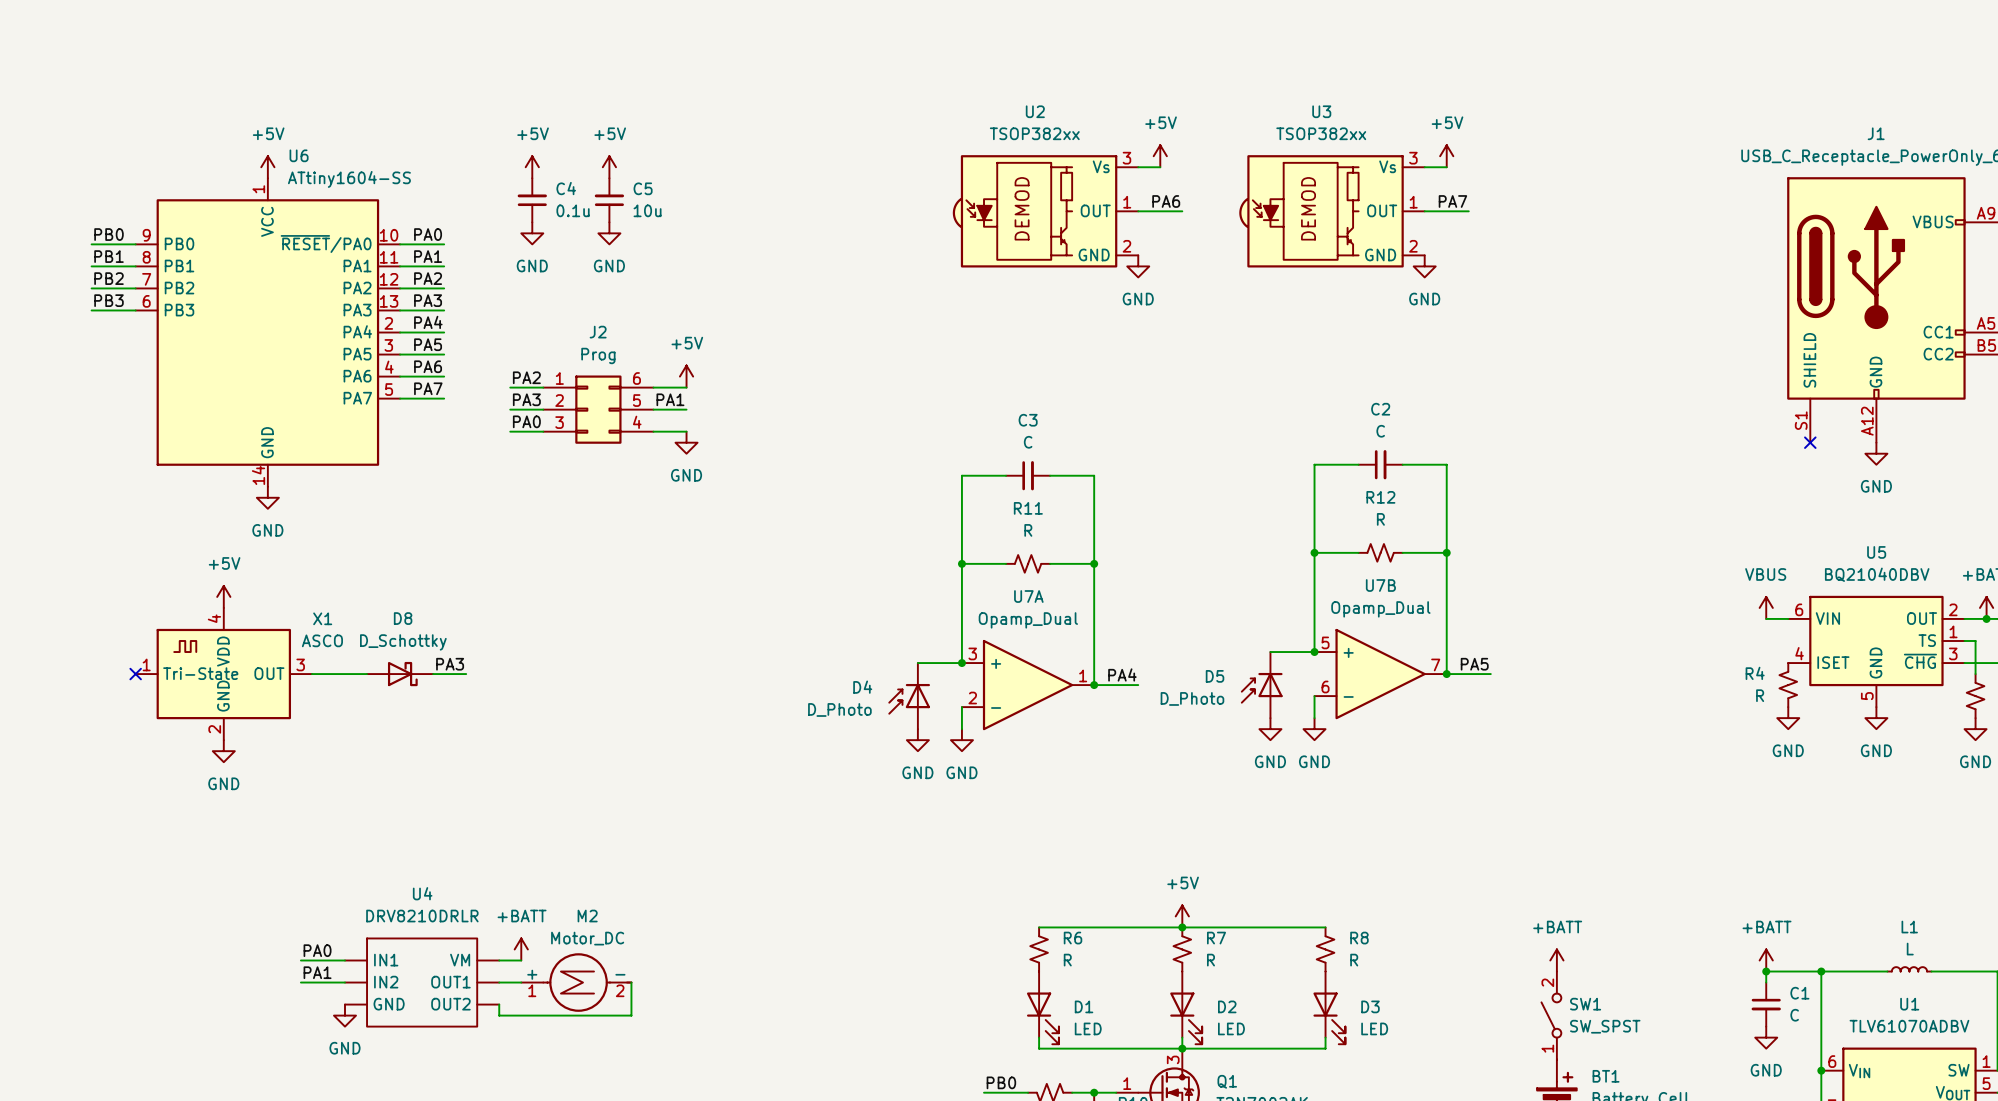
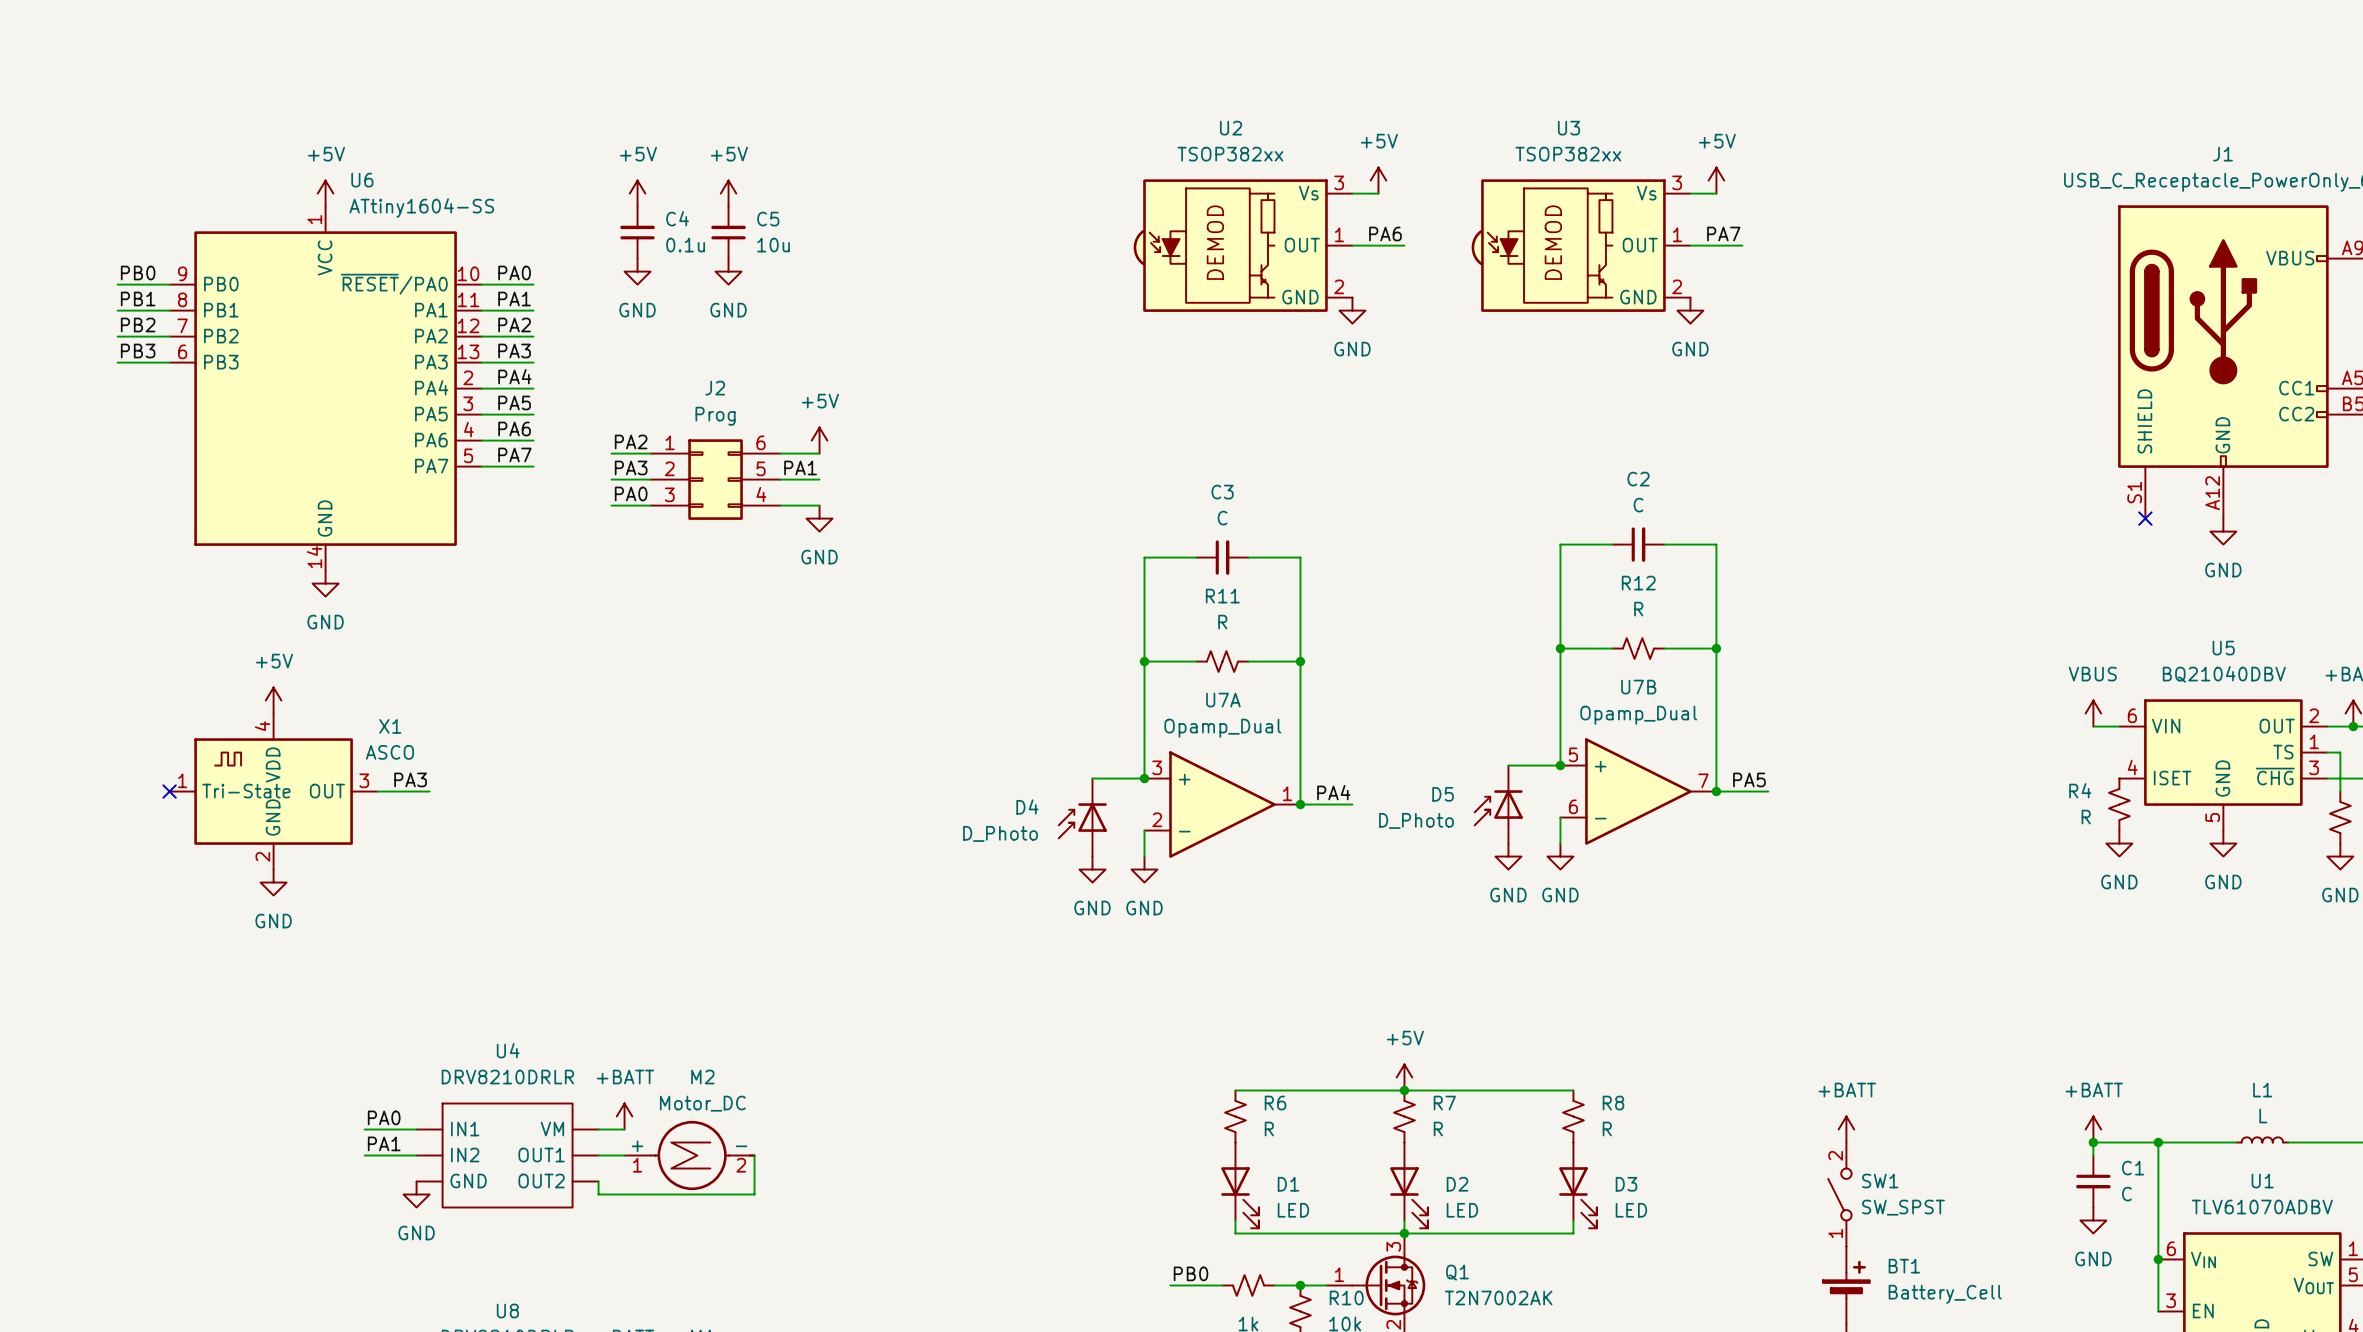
label position: PA3 (450, 664) -> PA3 (410, 779)
wire: (356, 674) (367, 674) -> none
D8: D_Schottky (400, 674) -> none
wire: (433, 674) (466, 674) -> none

